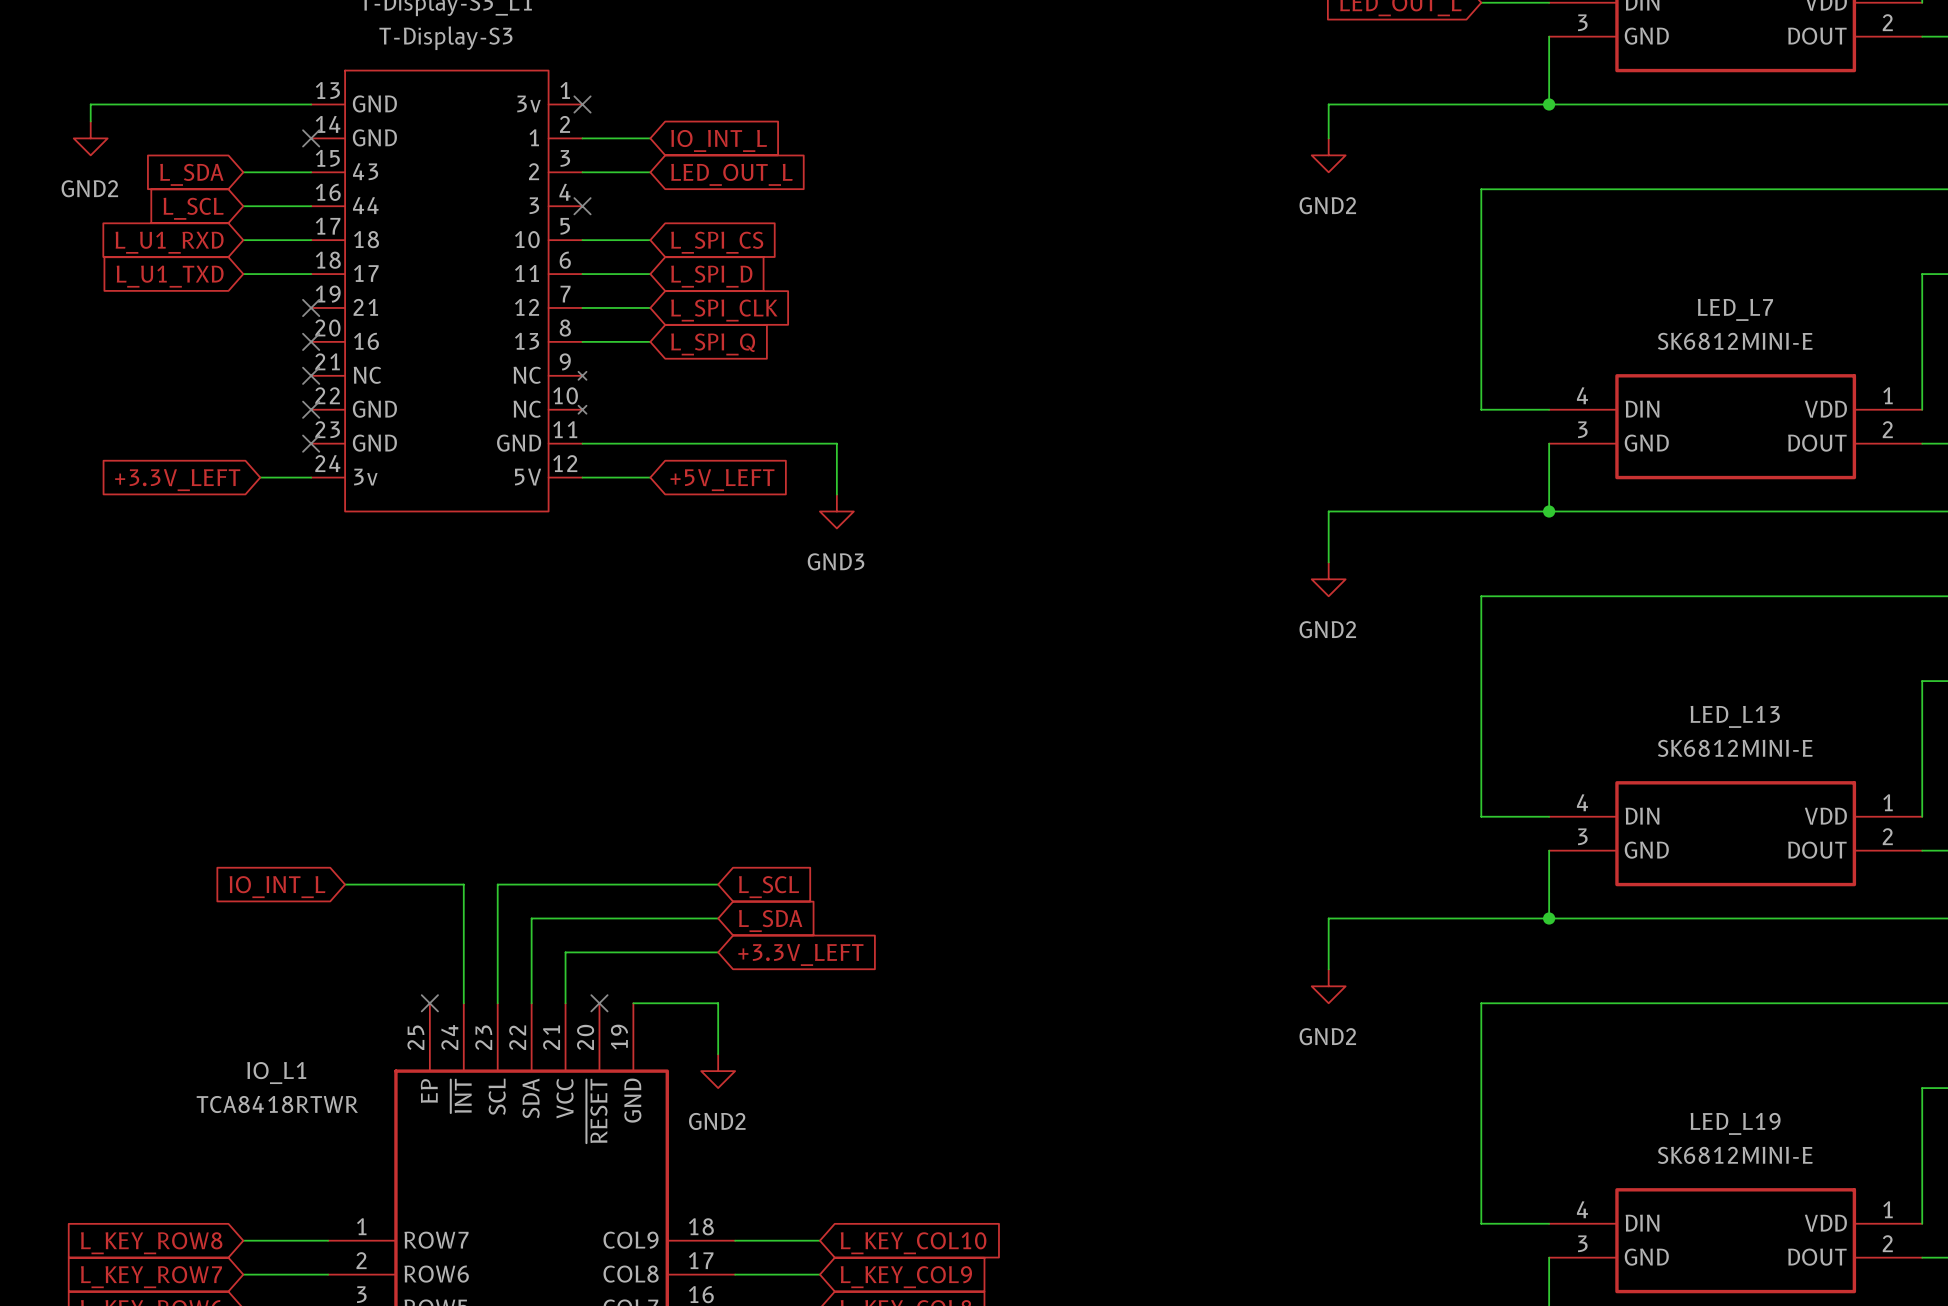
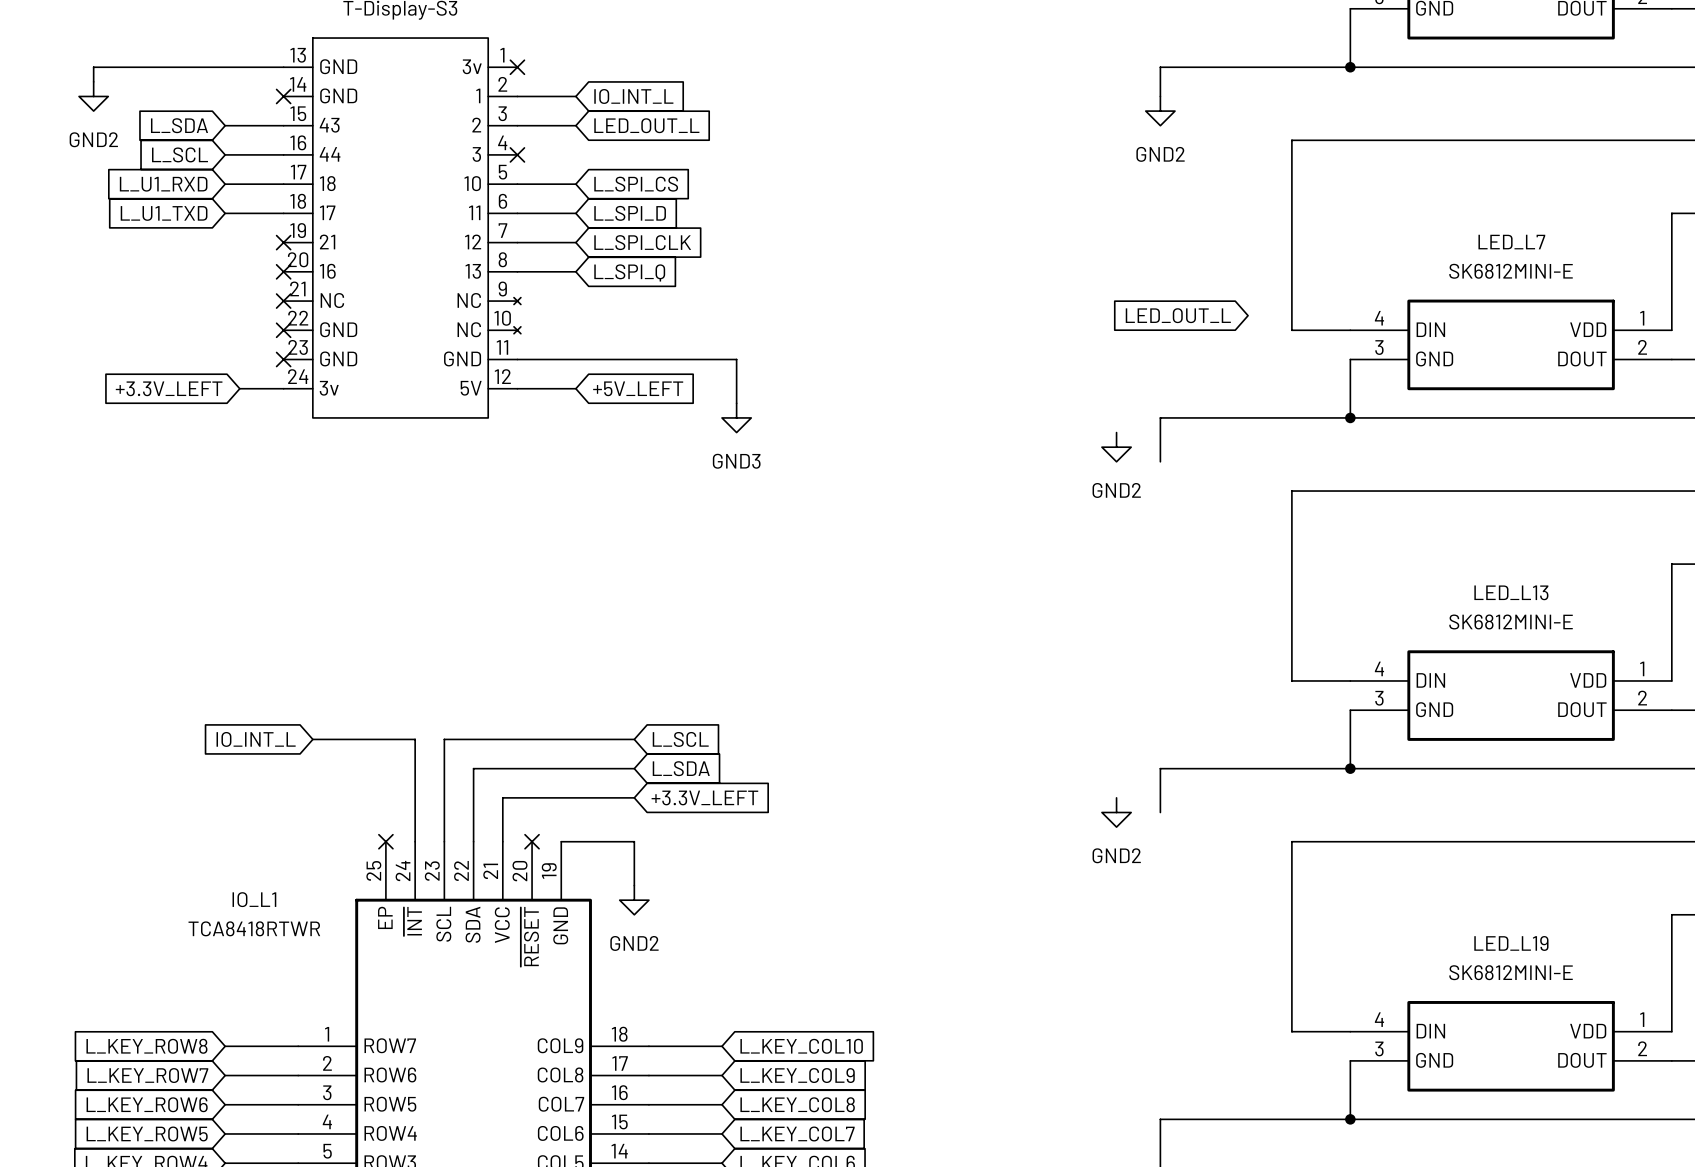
global label: none -> LED_OUT_L (1178, 315)
power symbol position: GND2 (1328, 579) -> GND2 (1116, 447)
power symbol position: GND2 (1328, 986) -> GND2 (1116, 812)

